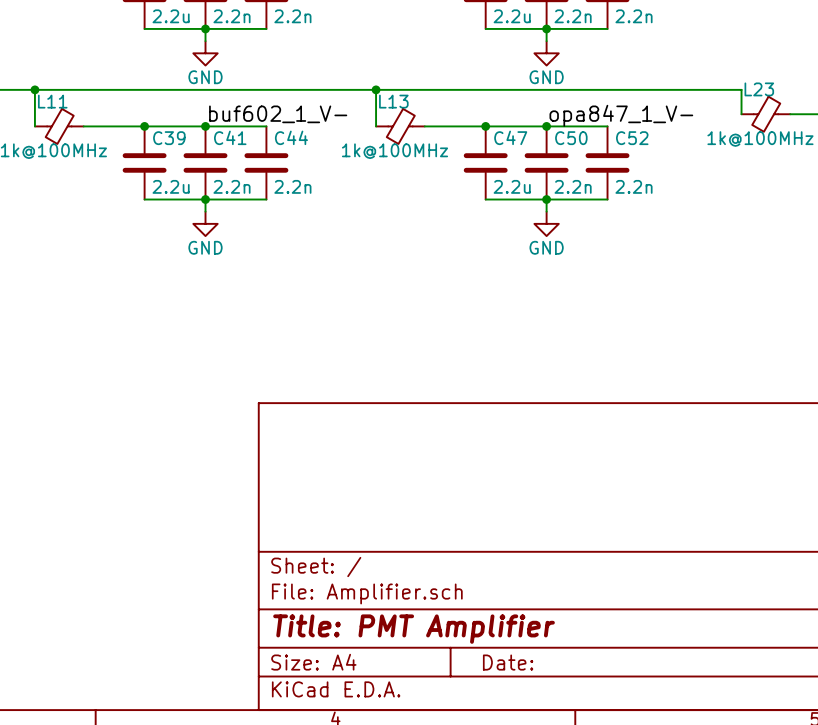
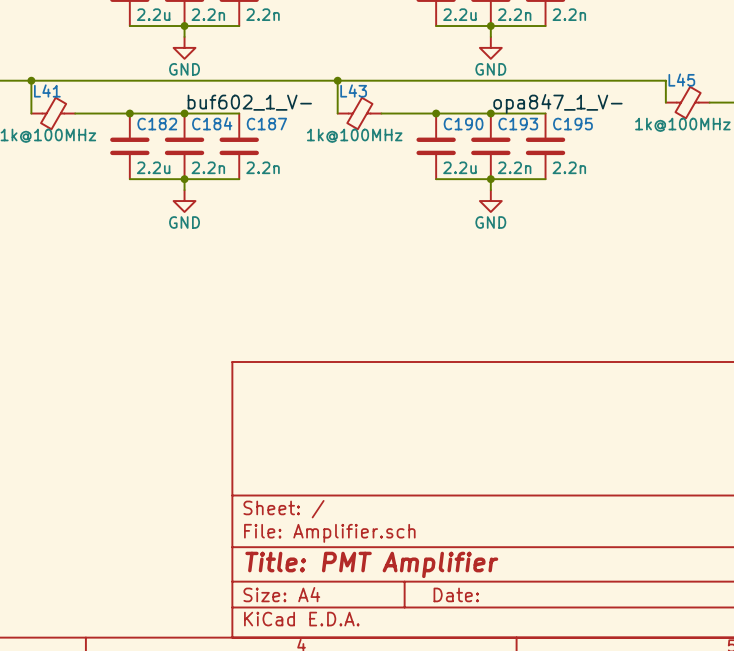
L23 name: L23 (759, 89) -> L45 (681, 80)
L11 name: L11 (52, 101) -> L41 (47, 90)
L13 name: L13 (393, 101) -> L43 (353, 90)
C41 name: C41 (230, 137) -> C184 (212, 123)
C44 name: C44 (291, 137) -> C187 (266, 124)
C47 name: C47 (510, 137) -> C190 (463, 124)
C39 name: C39 (169, 138) -> C182 (157, 124)
C50 name: C50 (571, 138) -> C193 (518, 124)
C52 name: C52 (632, 138) -> C195 (572, 124)

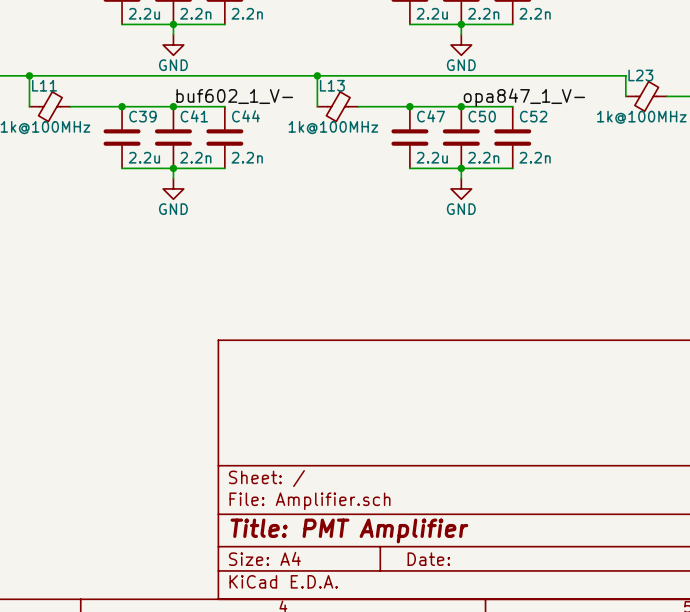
L45 name: L45 (681, 80) -> L23 (640, 75)
L41 name: L41 (47, 90) -> L11 (44, 85)
L43 name: L43 (353, 90) -> L13 (332, 85)
C184 name: C184 (212, 123) -> C41 (194, 116)
C182 name: C182 (157, 124) -> C39 (142, 116)
C187 name: C187 (266, 124) -> C44 (245, 116)
C190 name: C190 (463, 124) -> C47 (431, 116)
C193 name: C193 (518, 124) -> C50 (482, 116)
C195 name: C195 (572, 124) -> C52 (533, 116)

